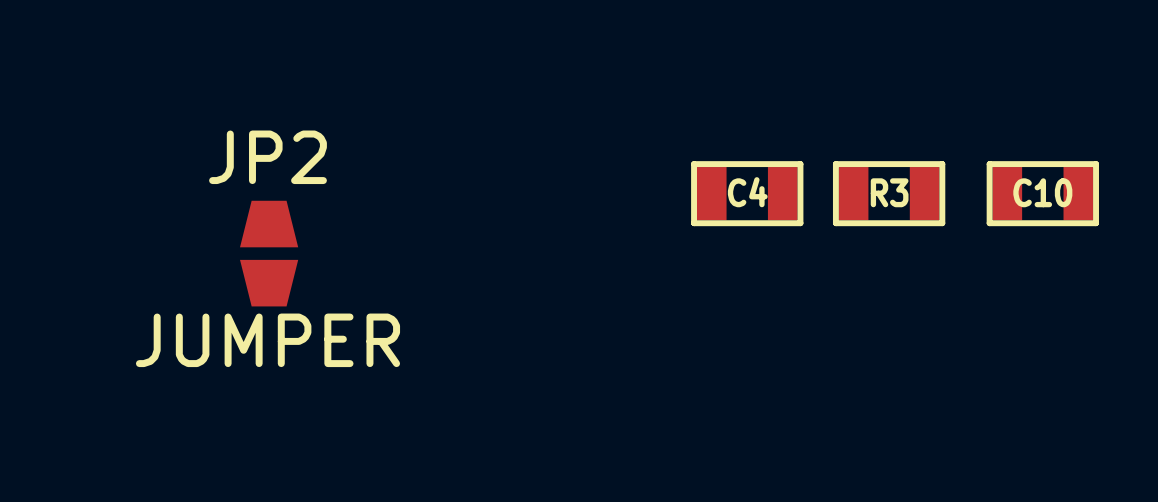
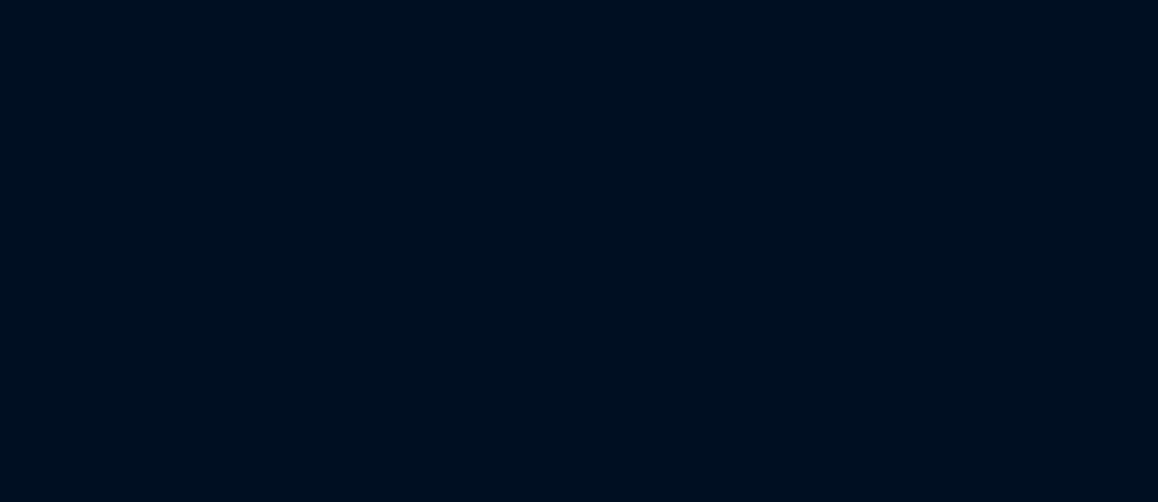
C4: (747, 193) -> none
R3: (889, 193) -> none
C10: (1042, 193) -> none
JP2: JUMPER (269, 253) -> none

